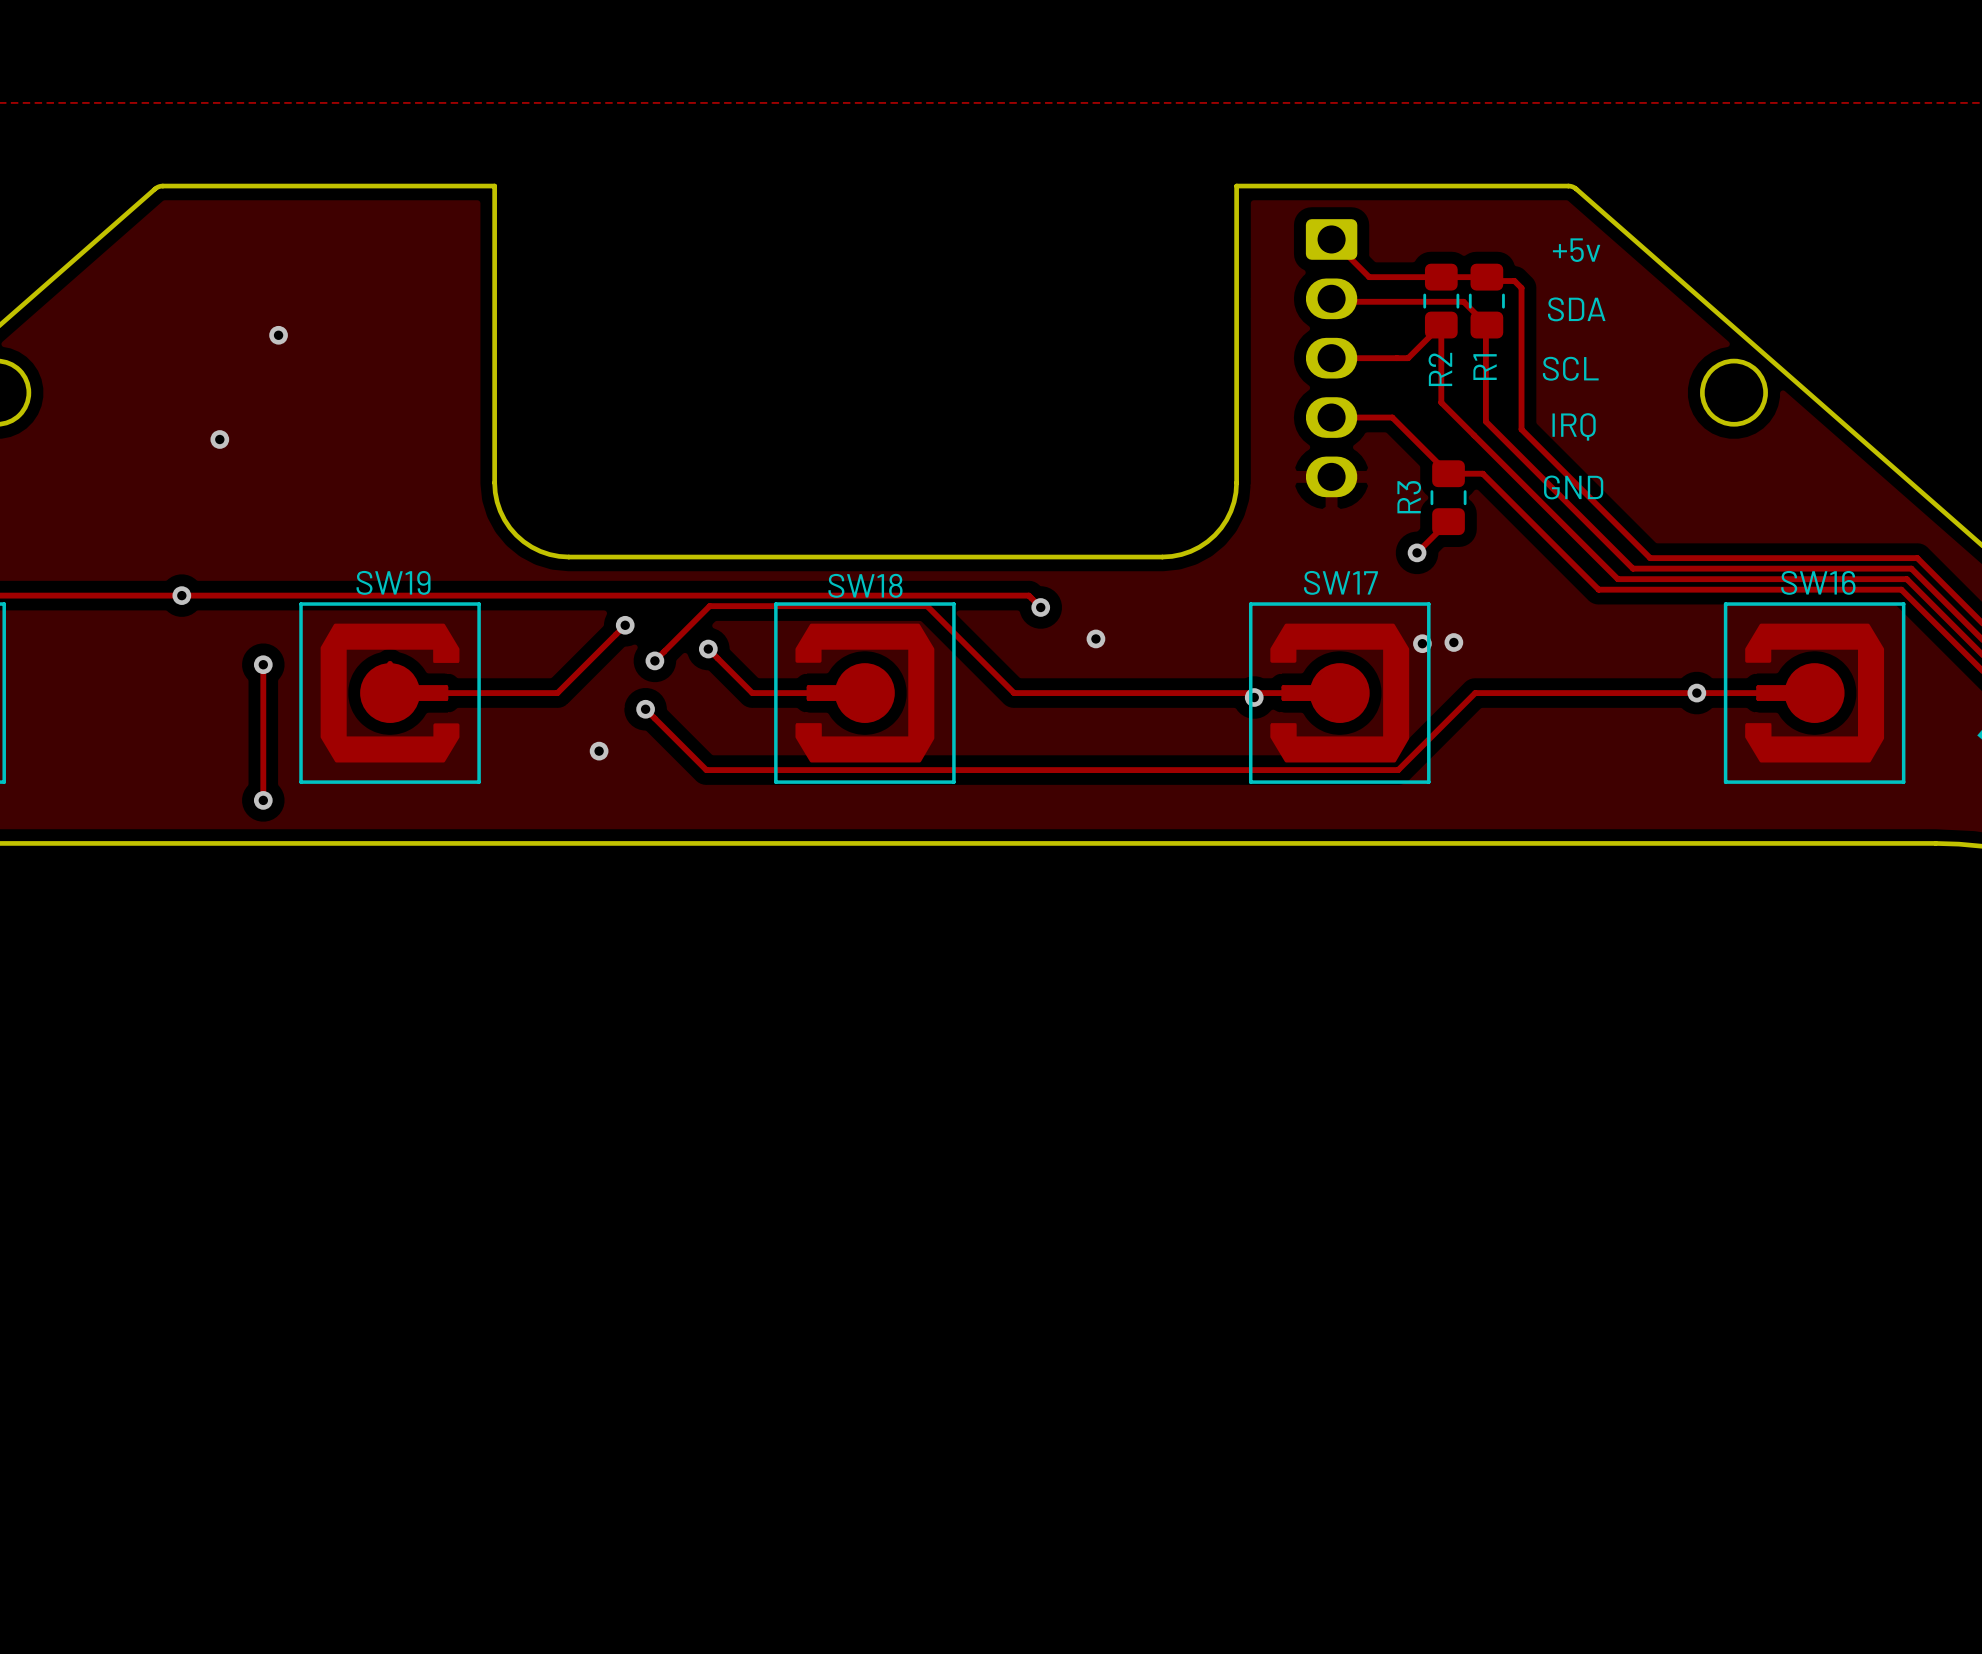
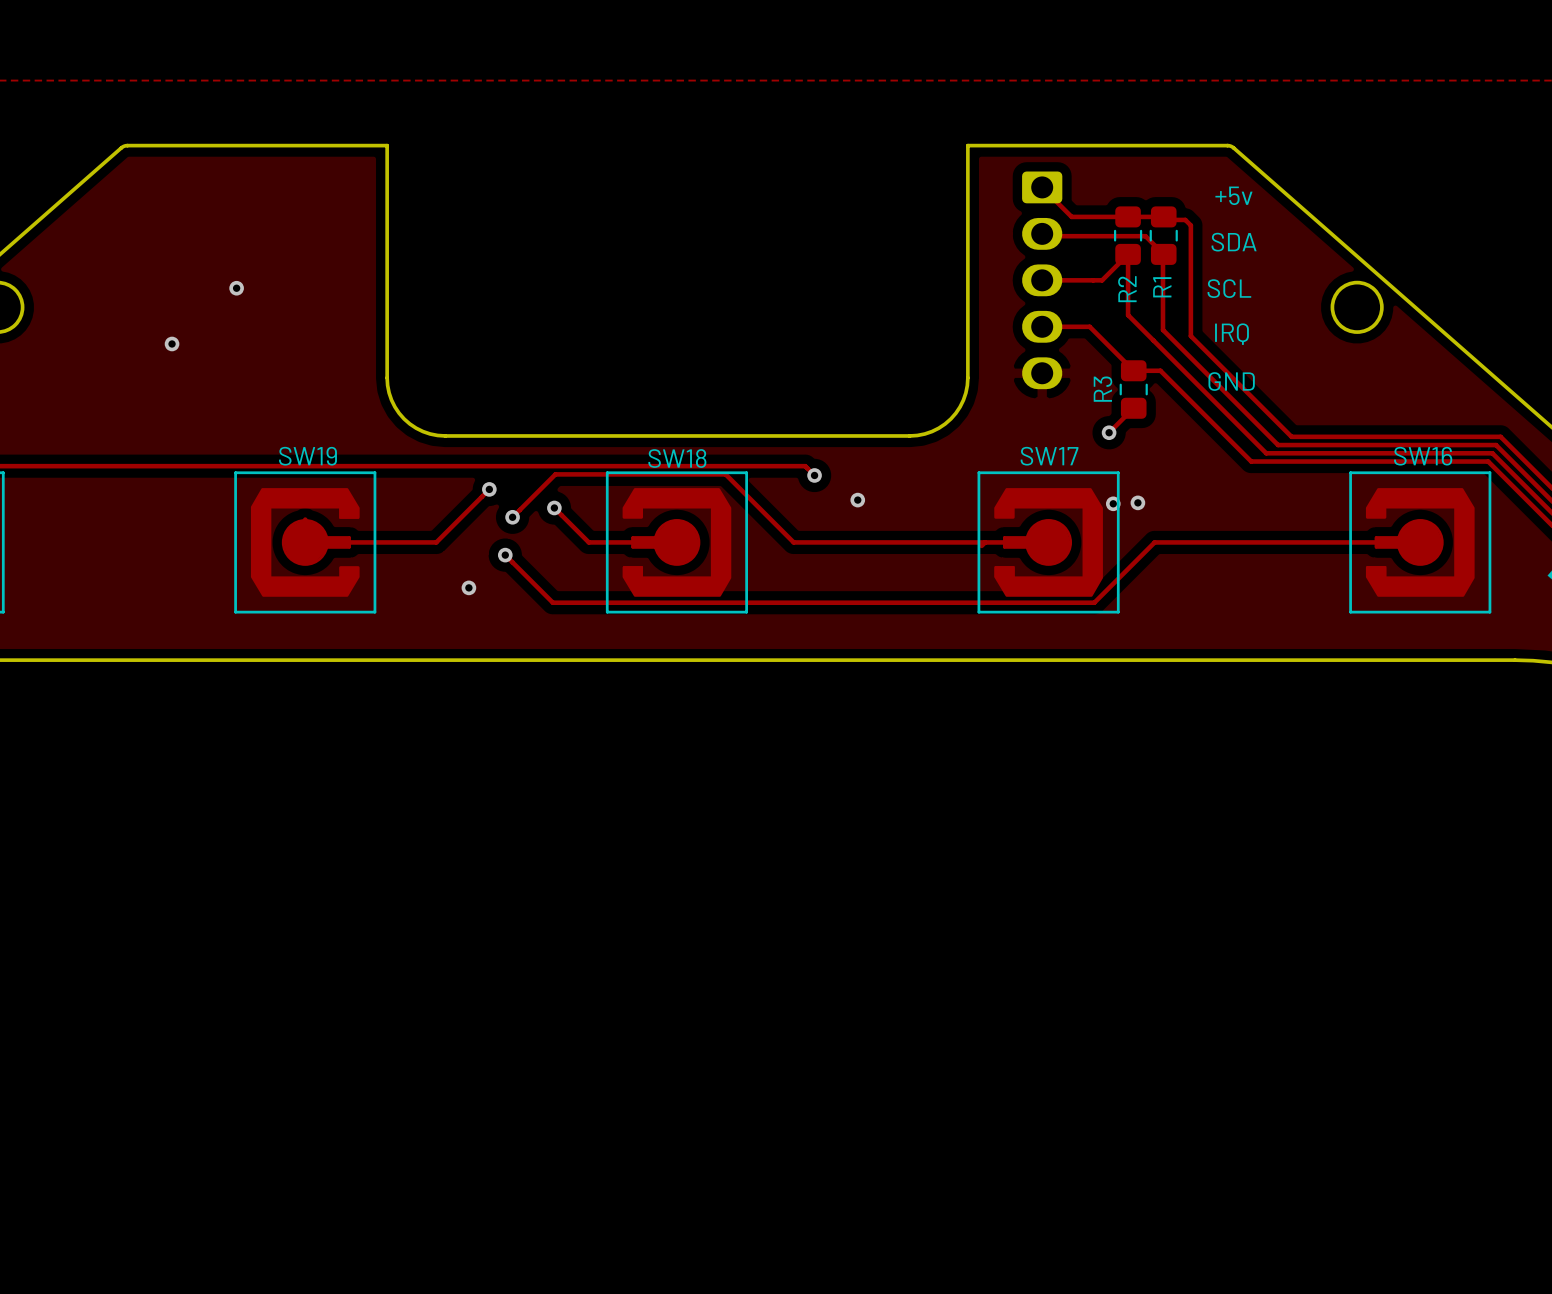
via position: (278, 335) -> (236, 288)
via: (181, 595) -> none
track: (263, 664) (263, 800) -> none
via: (263, 664) -> none
via: (1696, 693) -> none
via: (1254, 697) -> none
via: (263, 800) -> none

